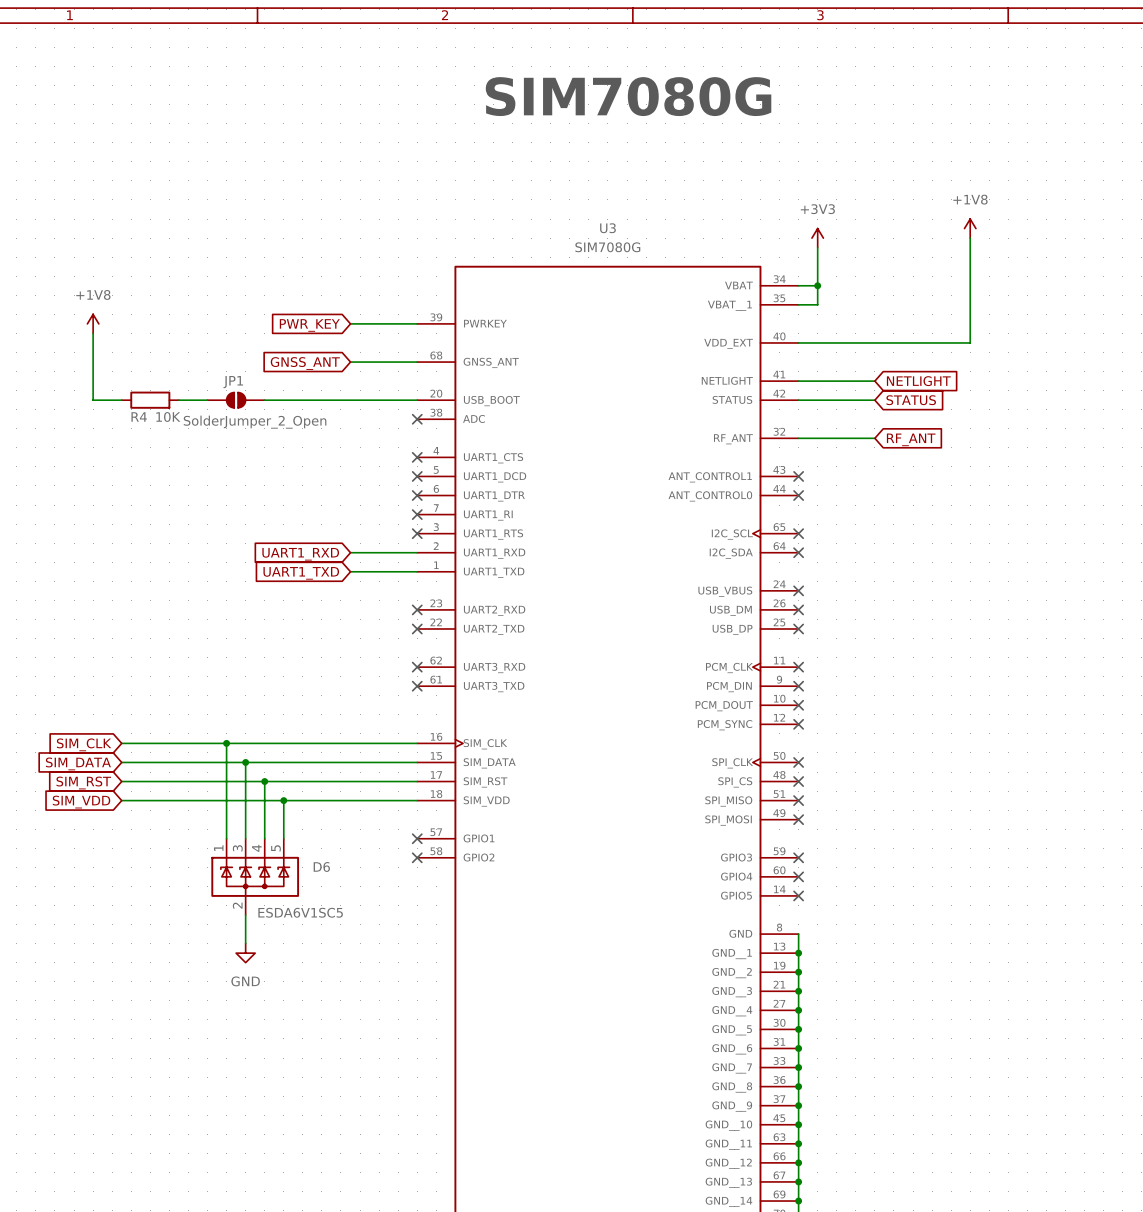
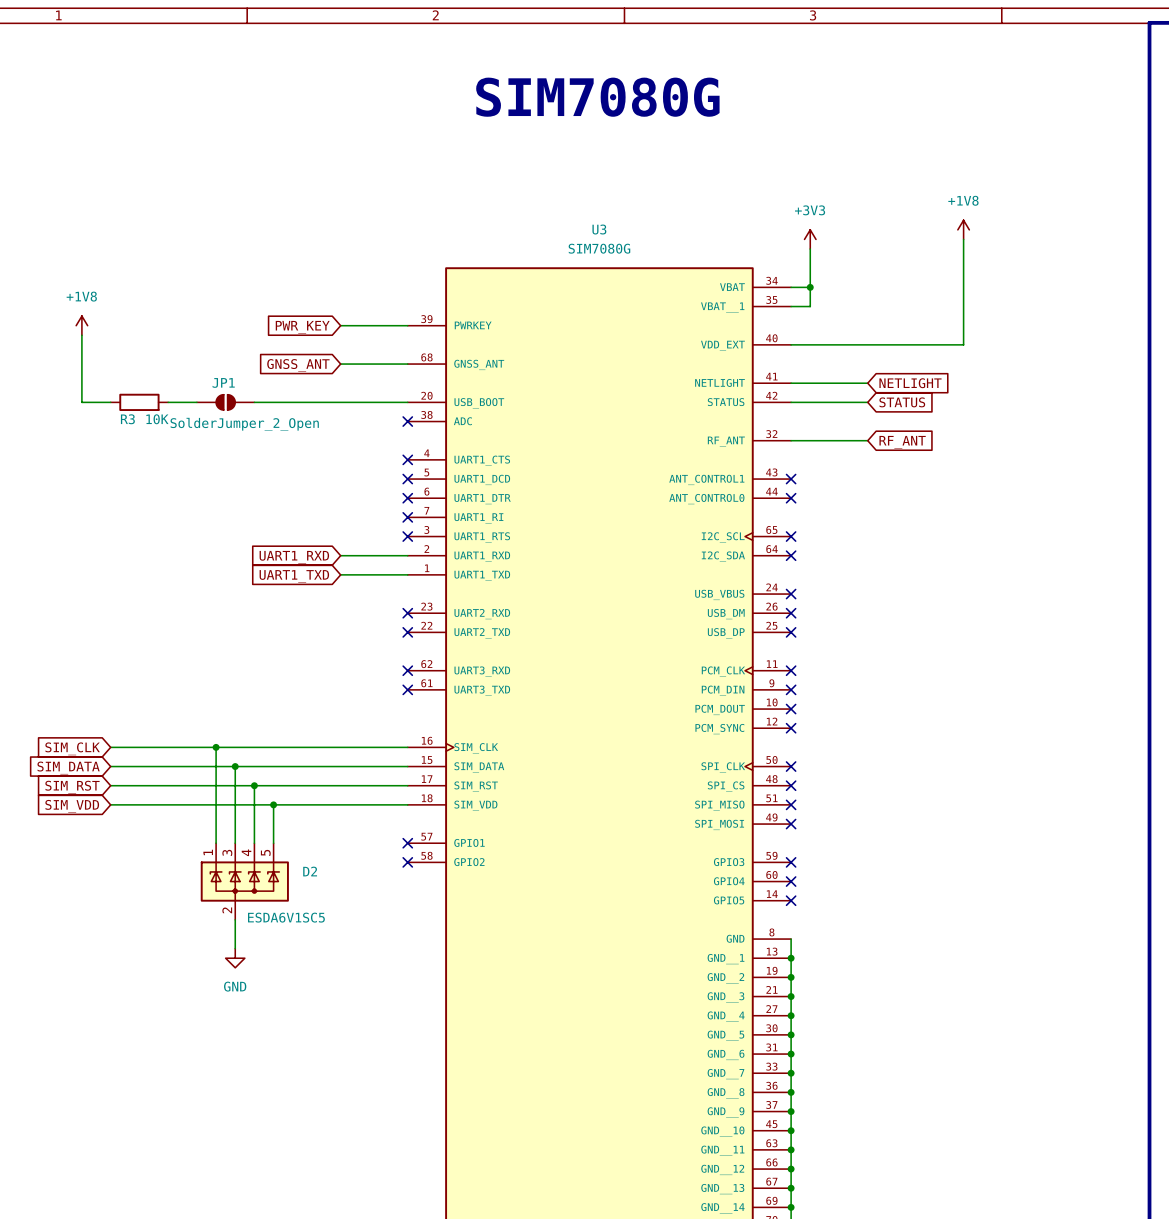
R4 name: R4 (139, 416) -> R3 (127, 419)
D6 name: D6 (321, 866) -> D2 (310, 871)

